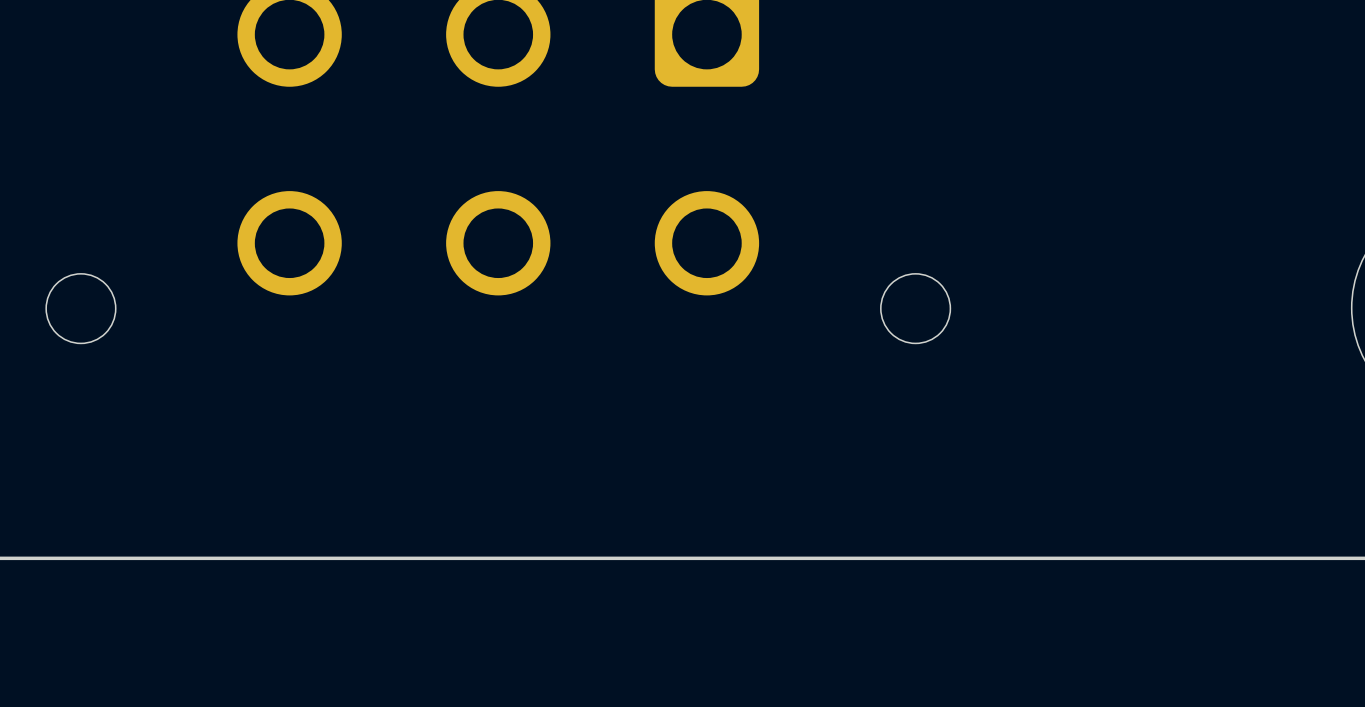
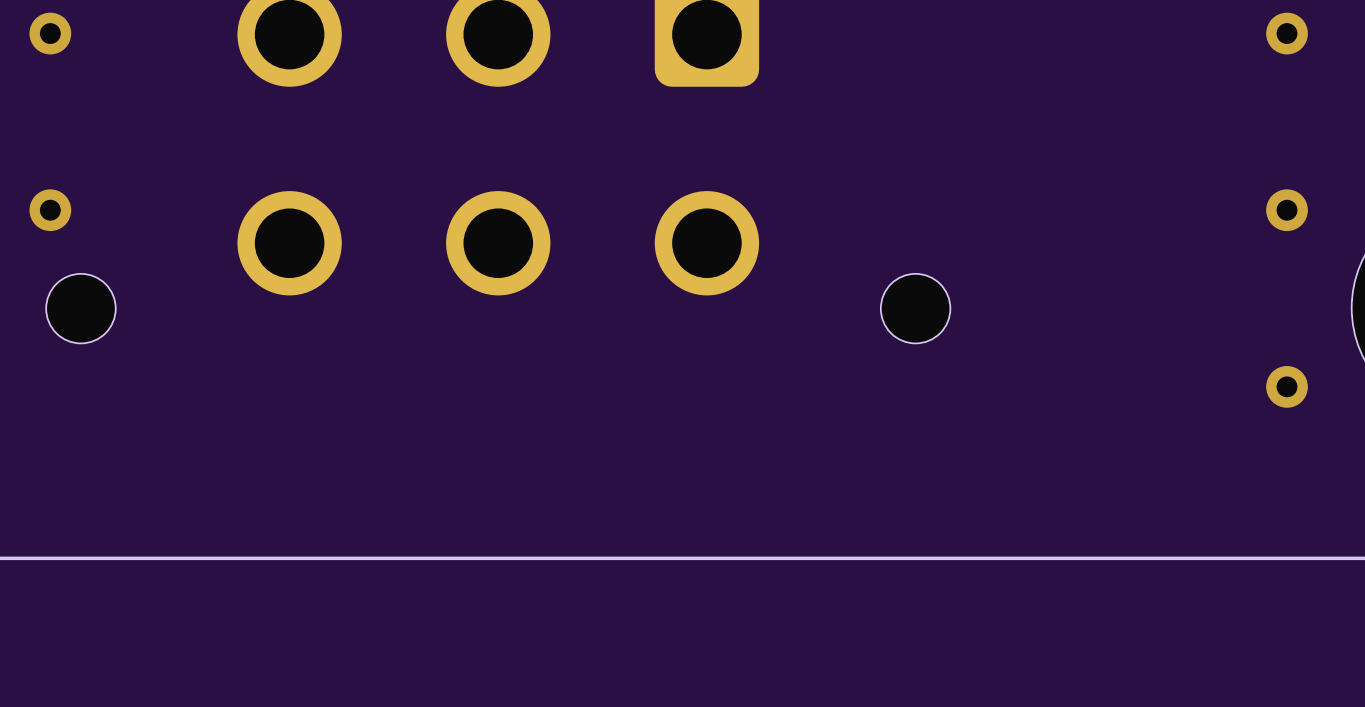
via: none -> (50, 33)
via: none -> (1287, 33)
via: none -> (50, 210)
via: none -> (1287, 210)
via: none -> (1287, 386)

